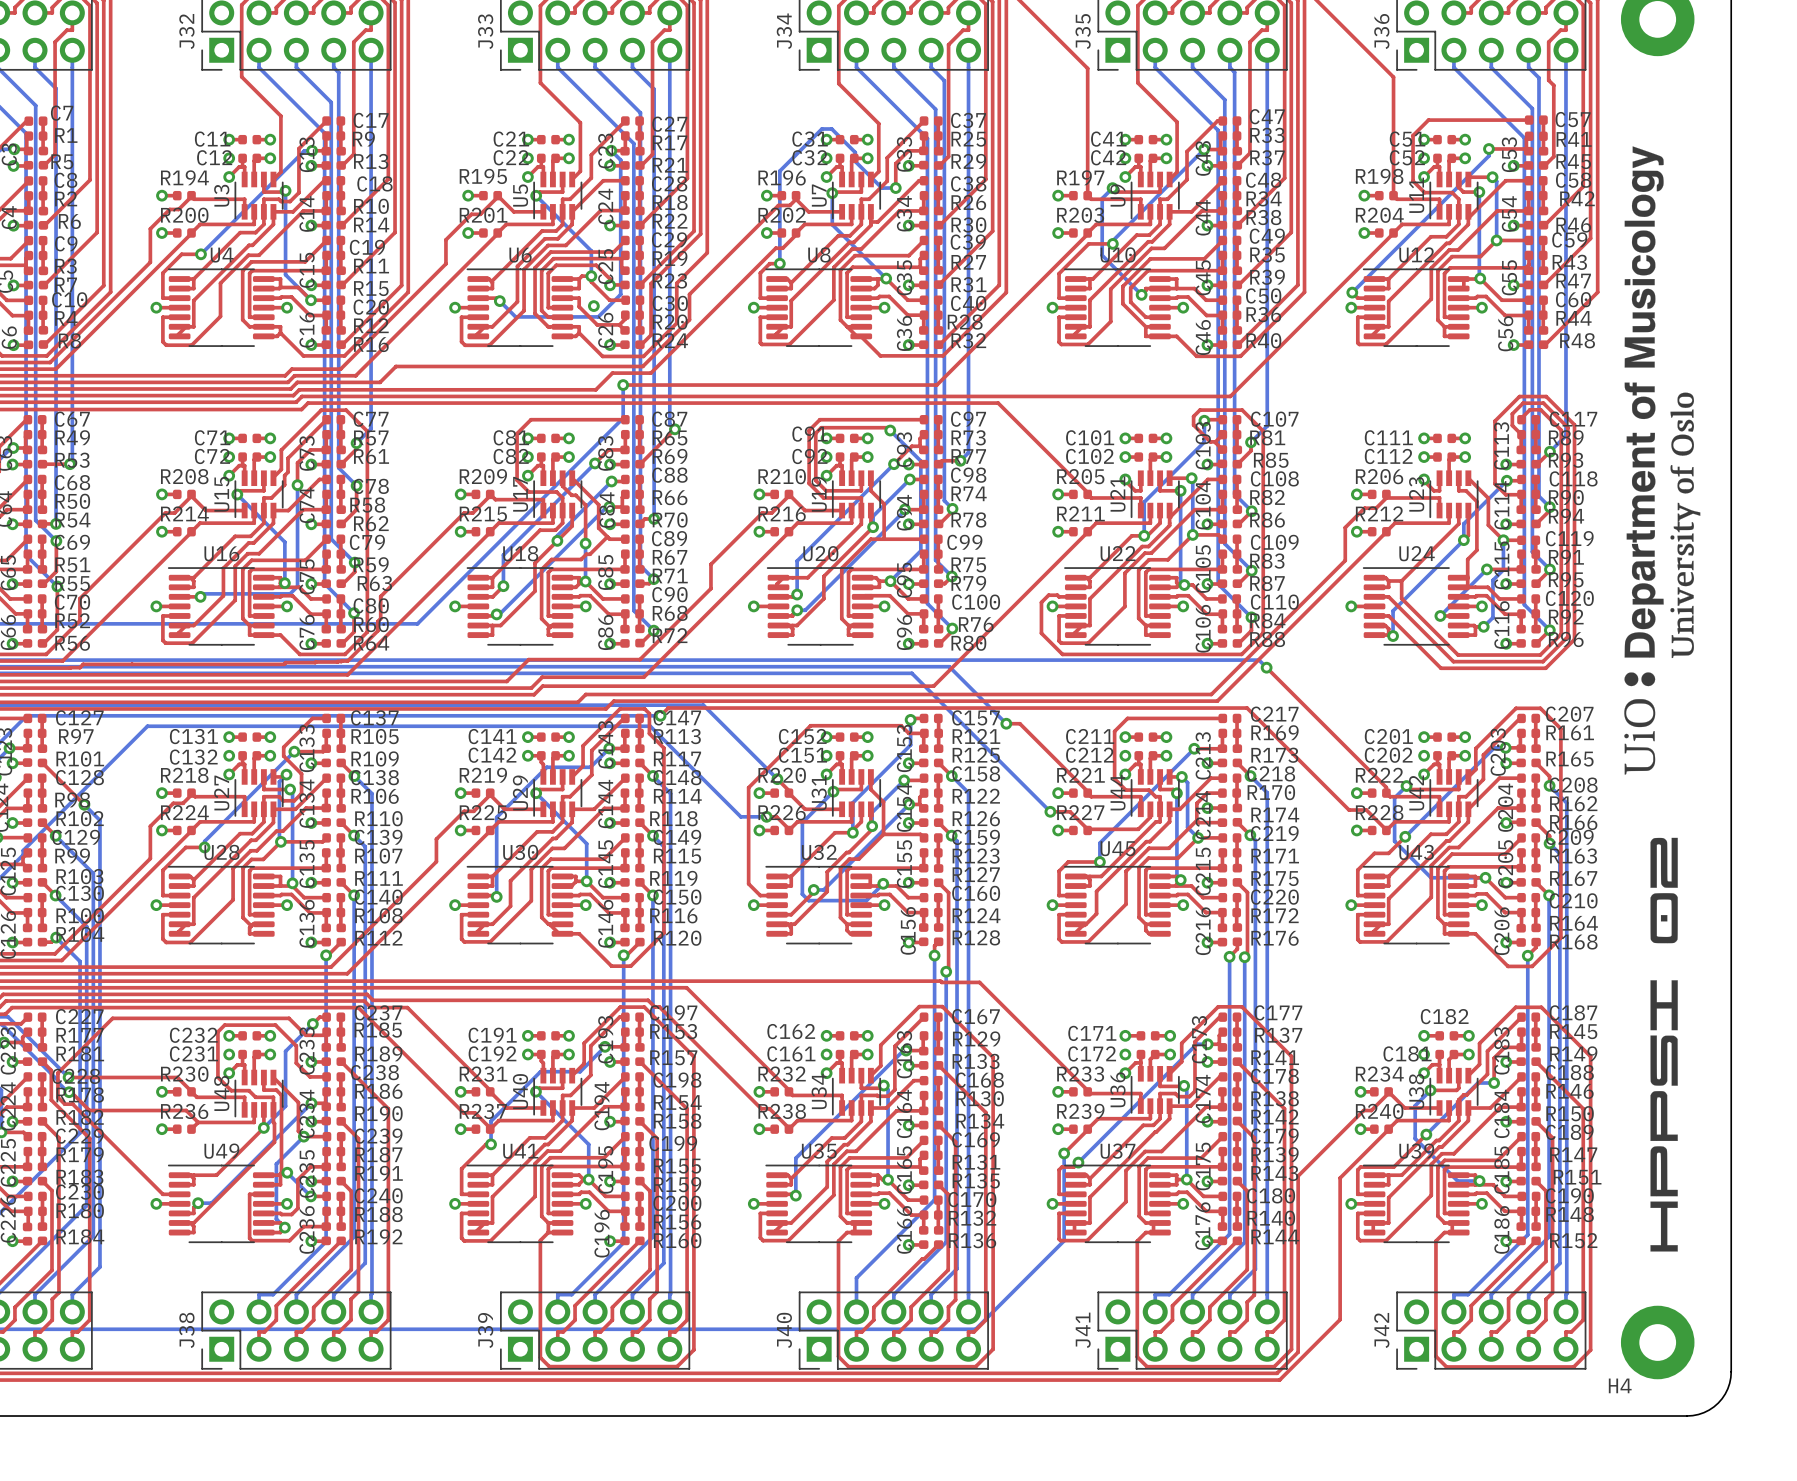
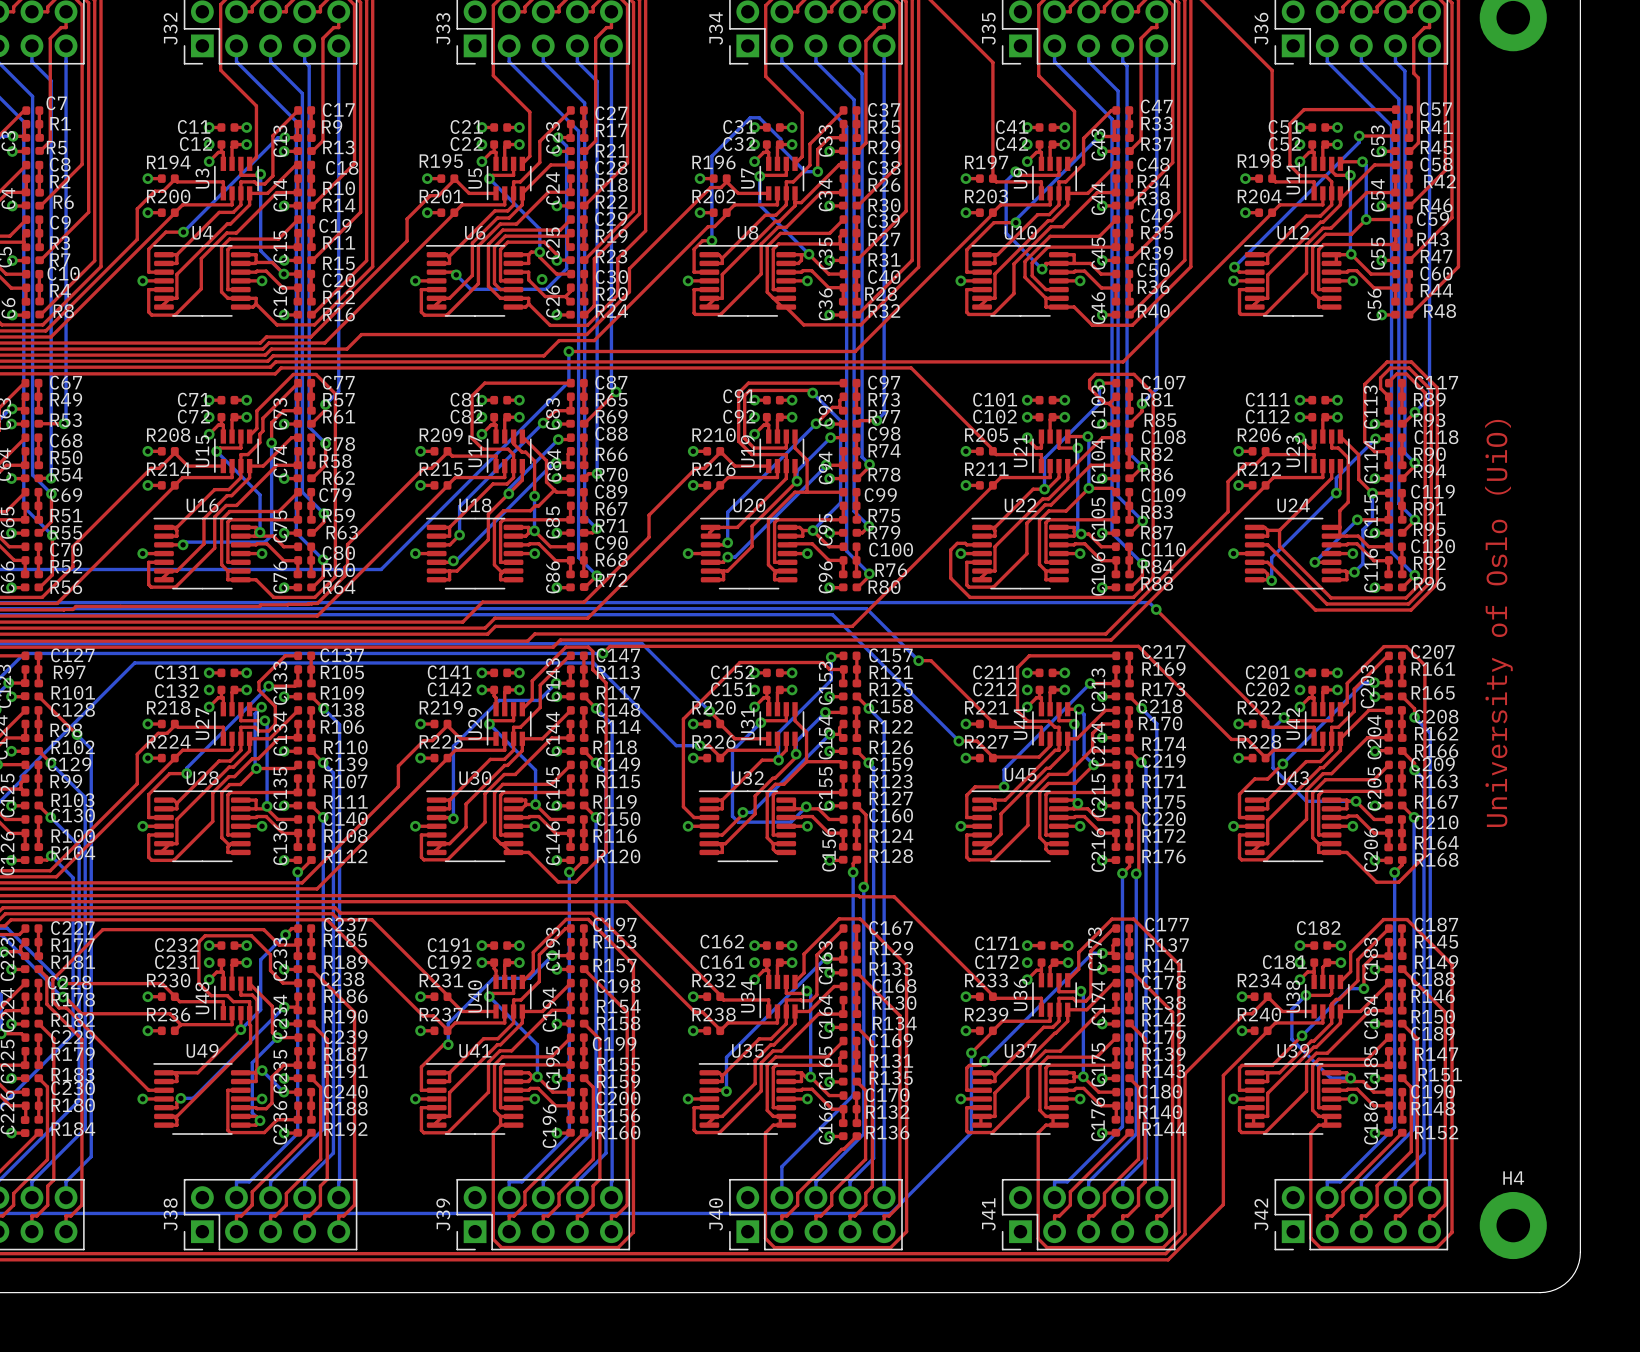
drawing: [1624, 146, 1701, 775] -> none
text: none -> University of Oslo (UiO) (1498, 623)
drawing: [1650, 837, 1678, 1252] -> none
H4 name position: H4 (1620, 1385) -> H4 (1513, 1178)

